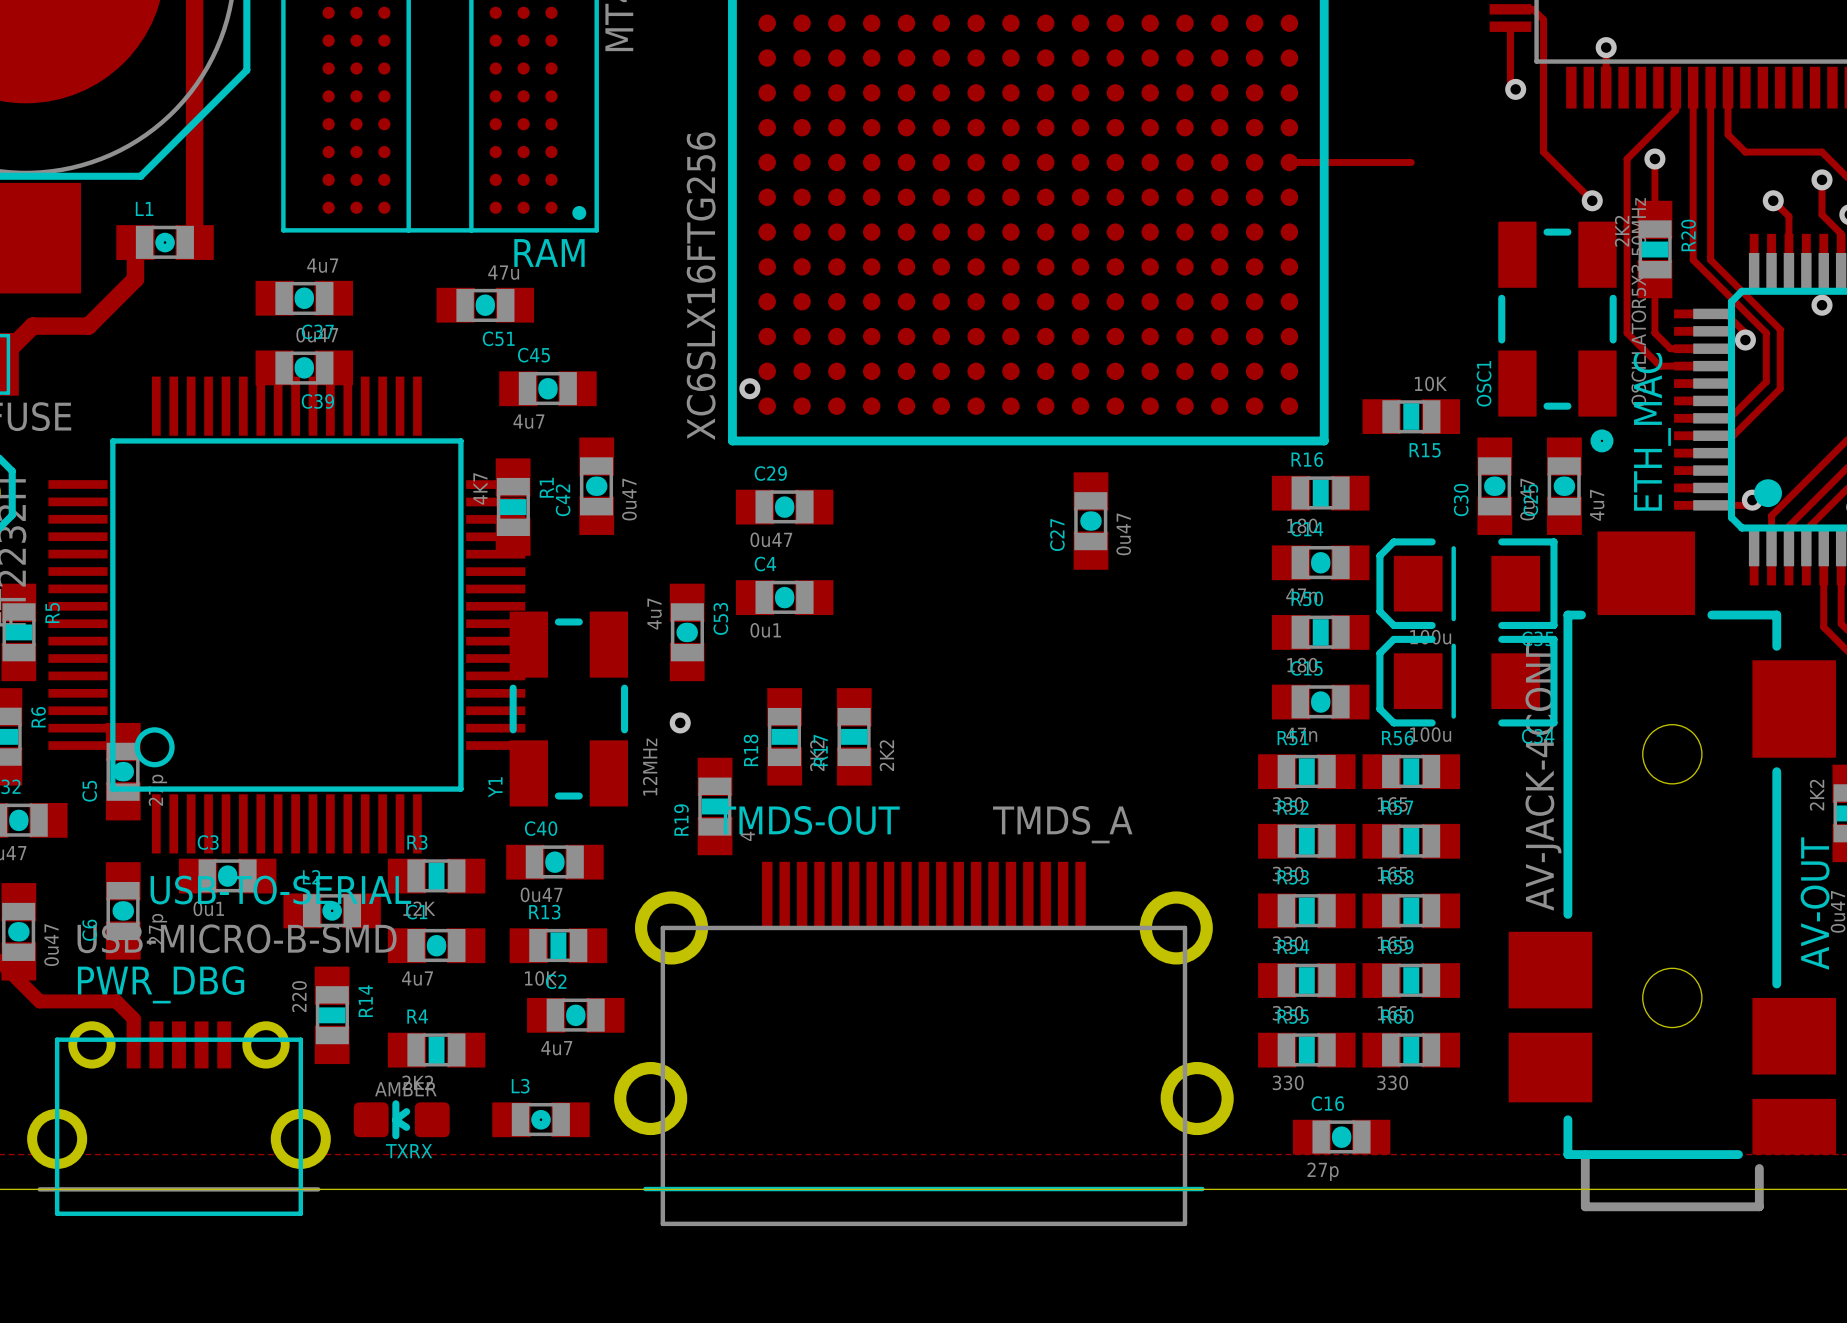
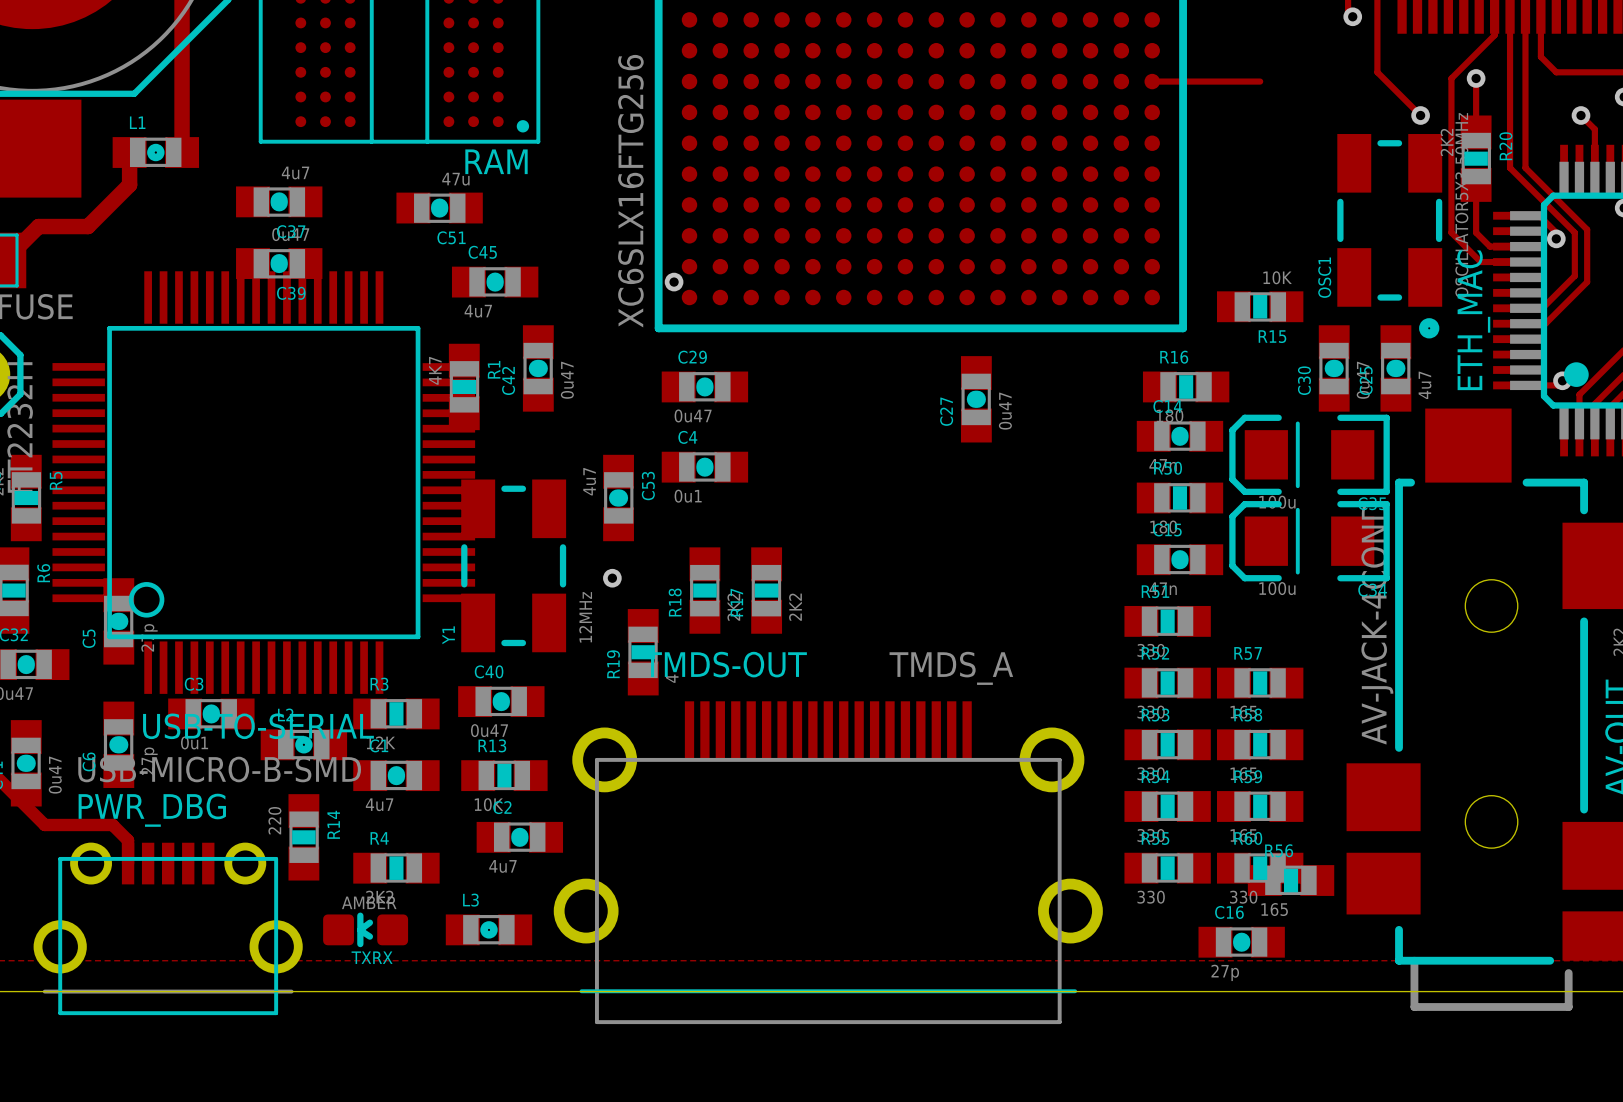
R16 position: (1320, 493) -> (1186, 386)
R56 position: (1411, 771) -> (1291, 880)
C16 position: (1341, 1137) -> (1241, 942)

